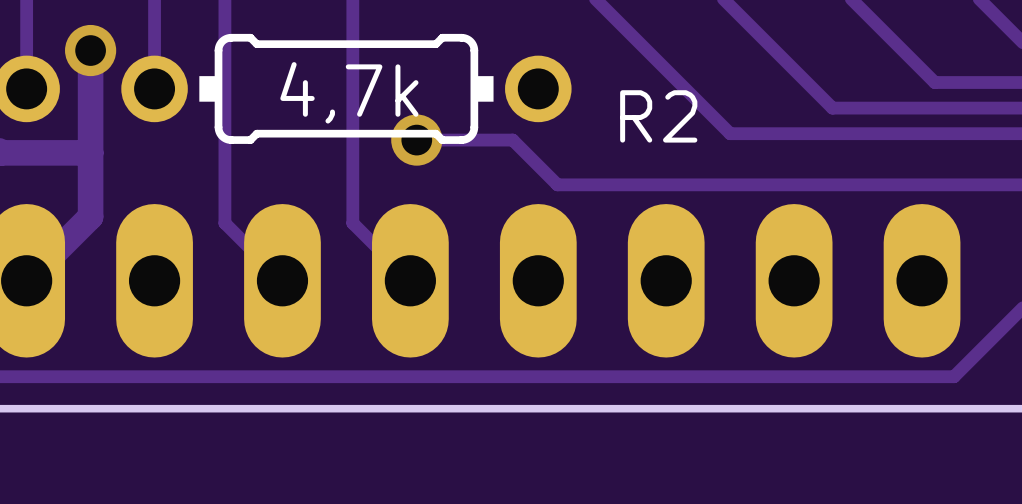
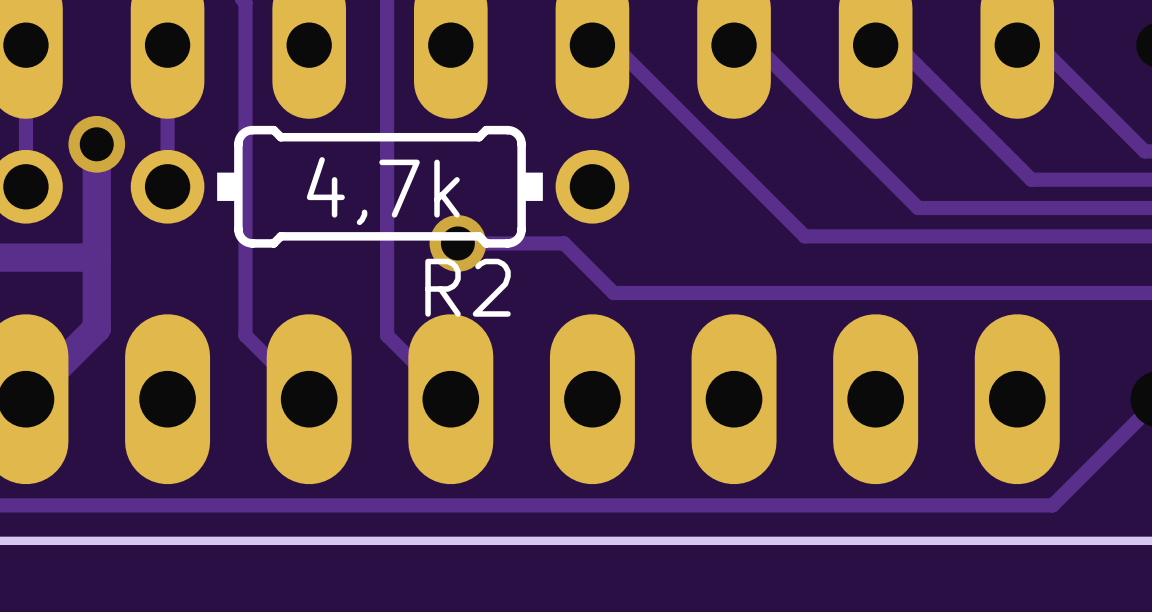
R2 name position: R2 (658, 116) -> R2 (468, 287)

